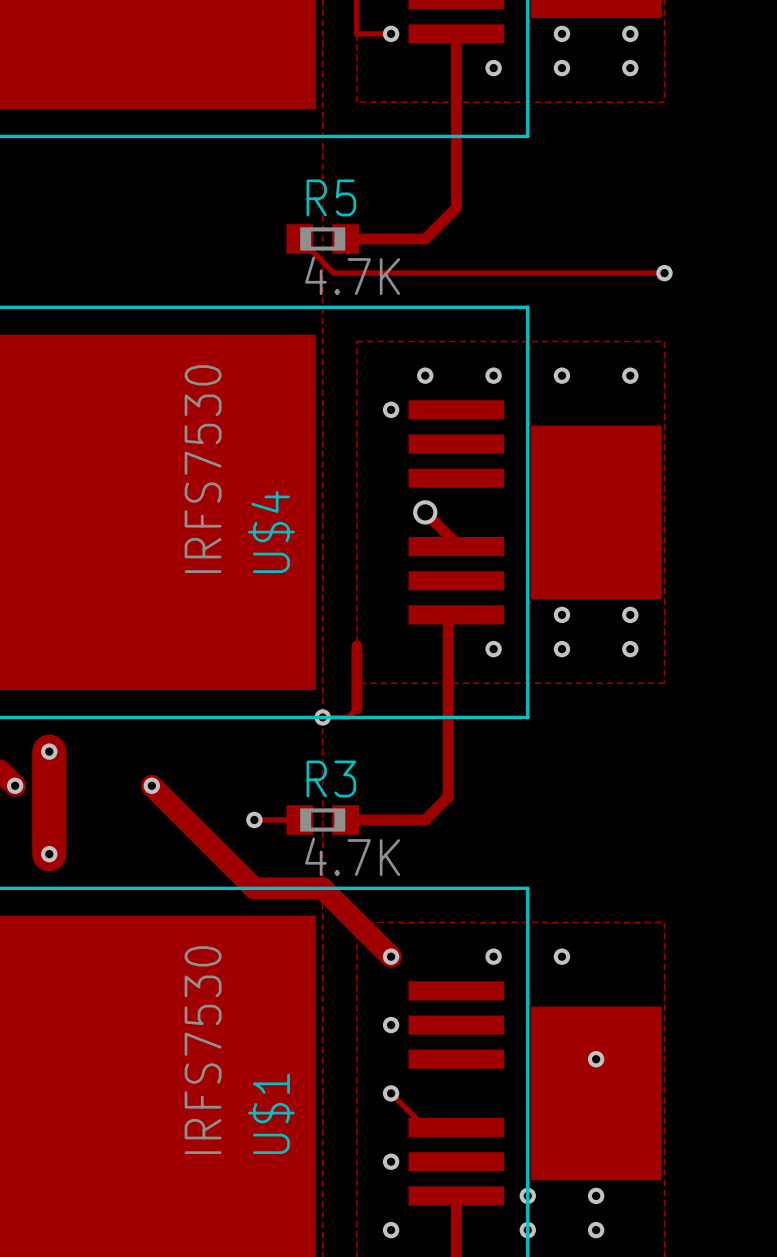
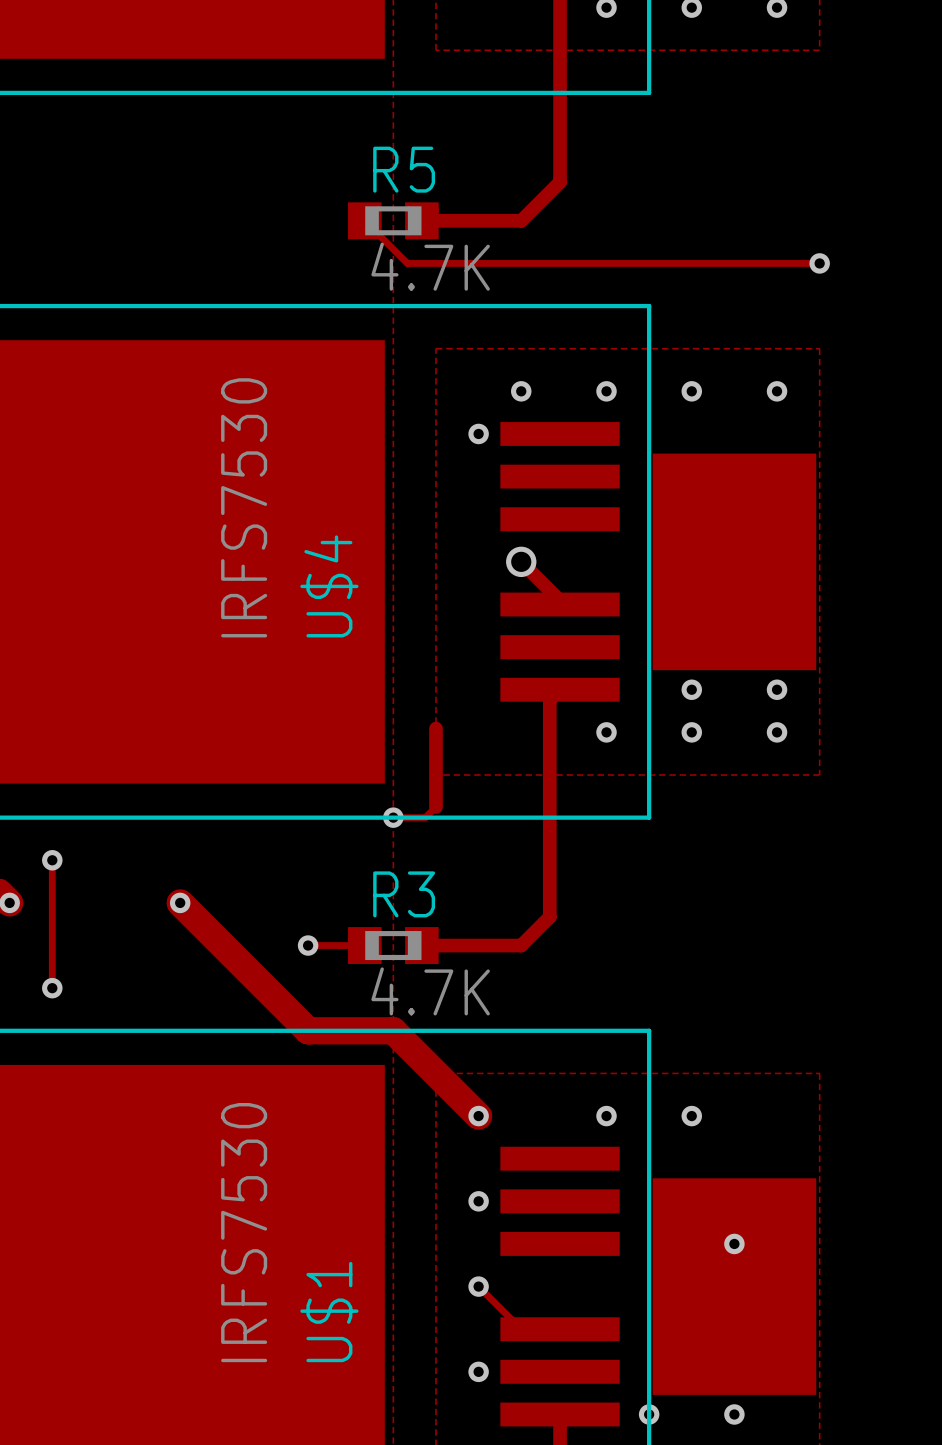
track width: thick (49, 751) (49, 854) -> thin (52, 860) (52, 988)

